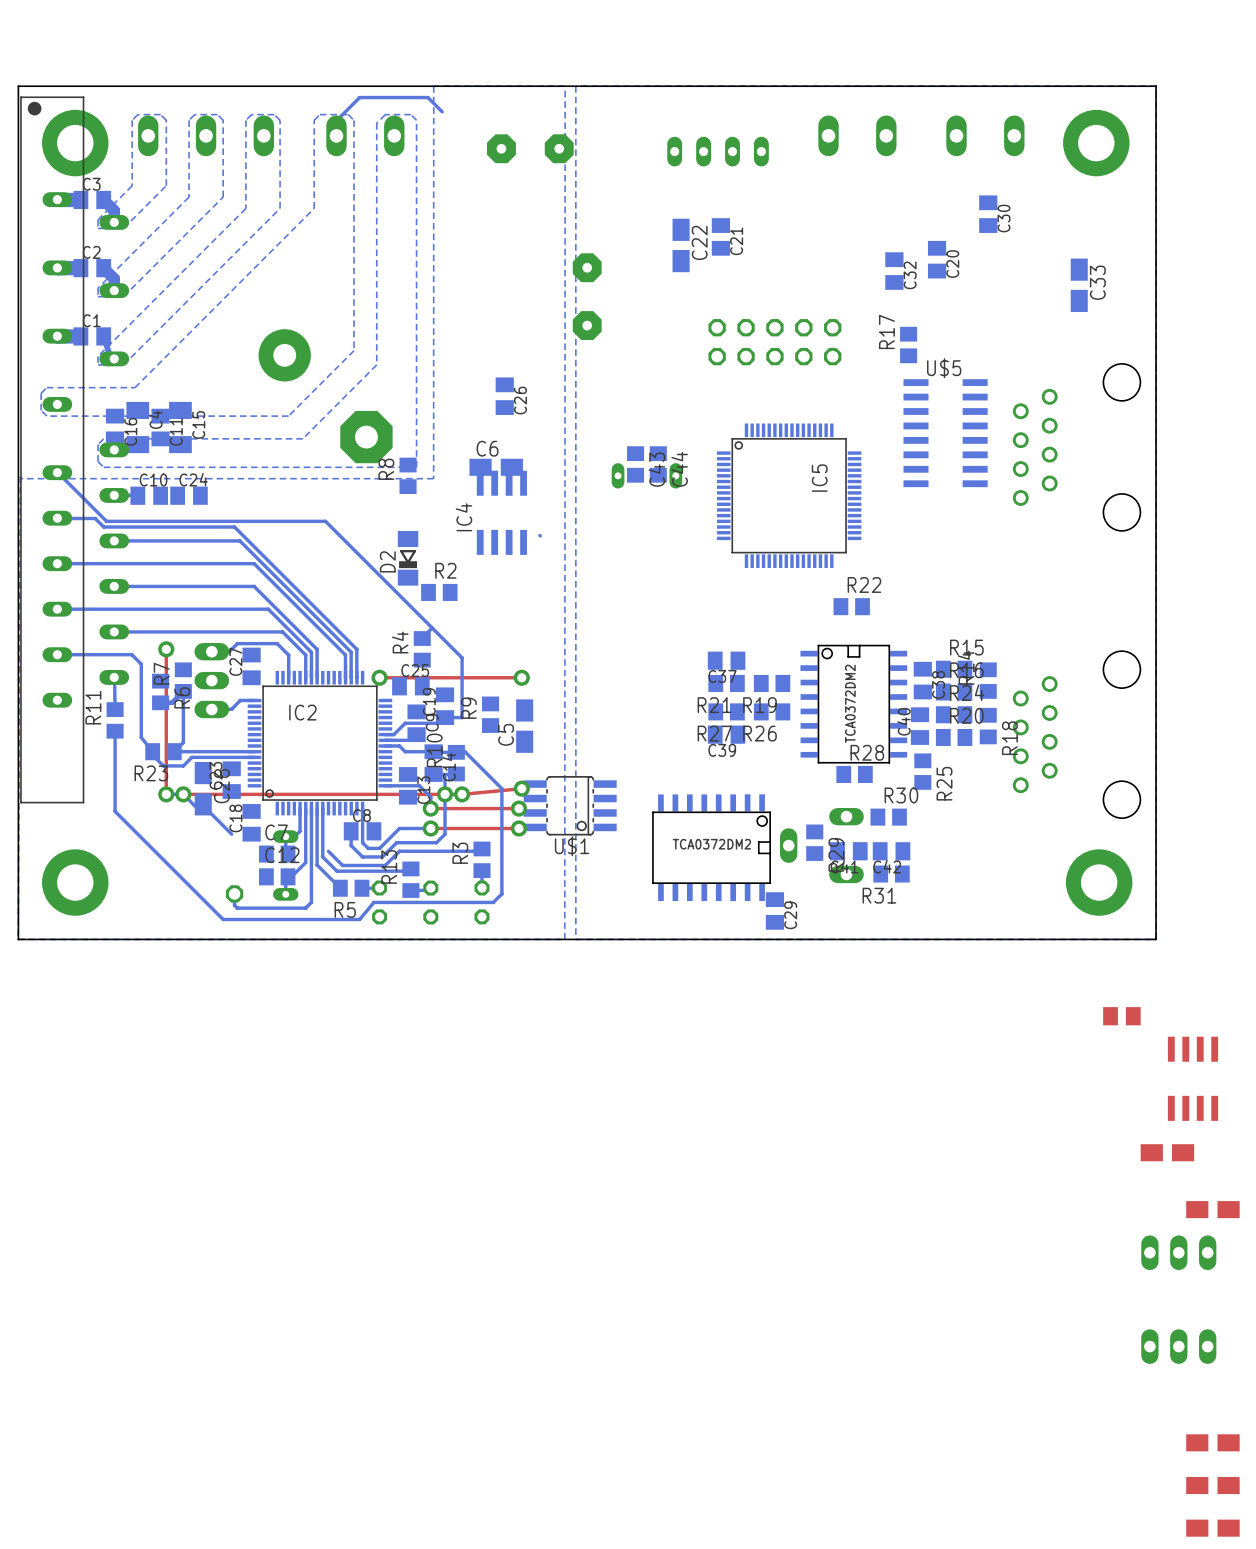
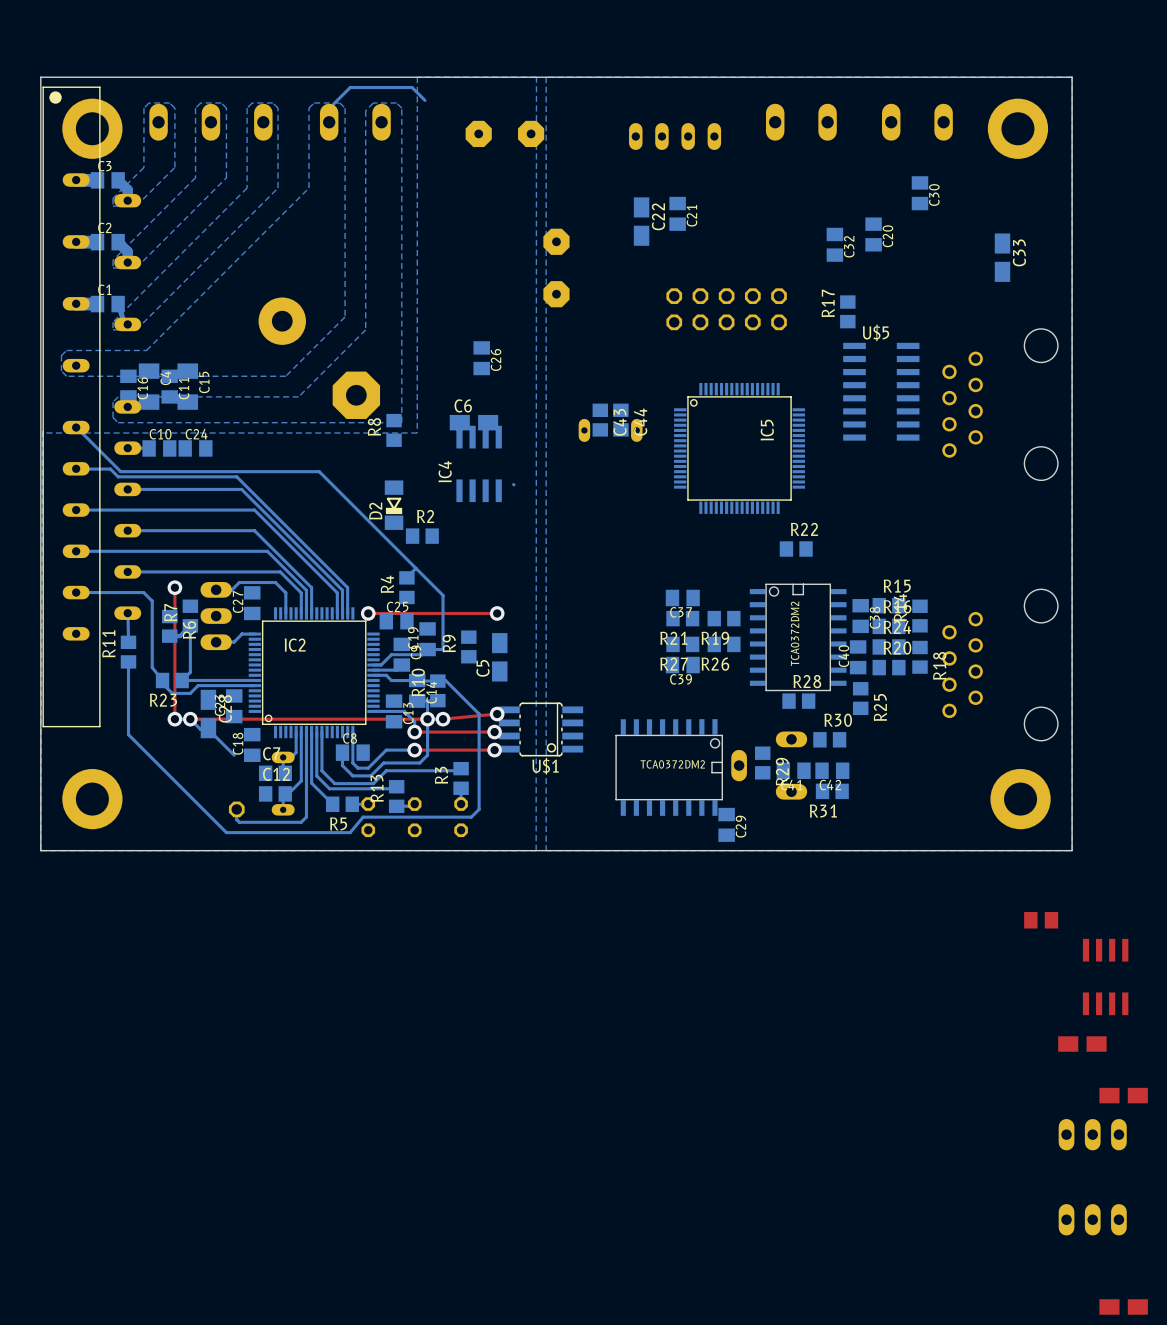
bottom track: none -> (321, 732) (321, 770)

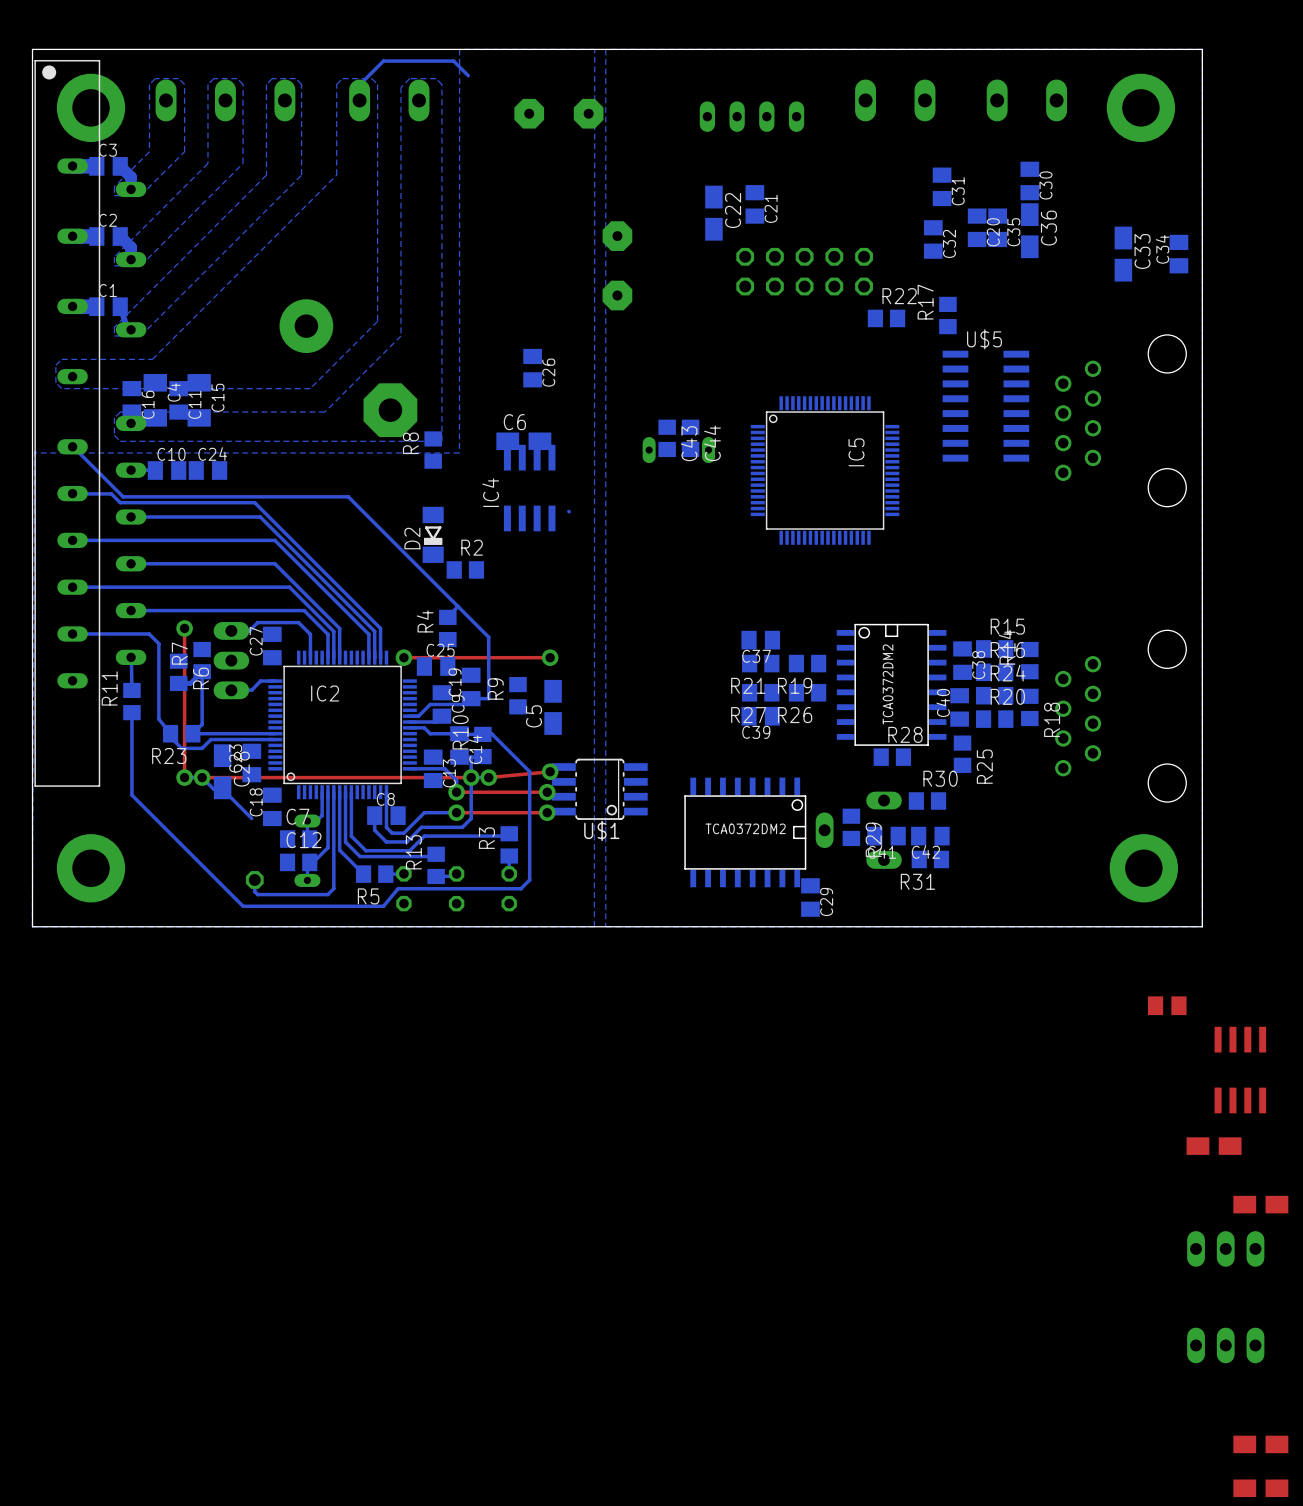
C31: none -> (942, 186)
C35: none -> (997, 227)
C36: none -> (1029, 230)
C34: none -> (1178, 254)
part position: (726, 309) -> (804, 271)
R22 position: (796, 549) -> (886, 318)

